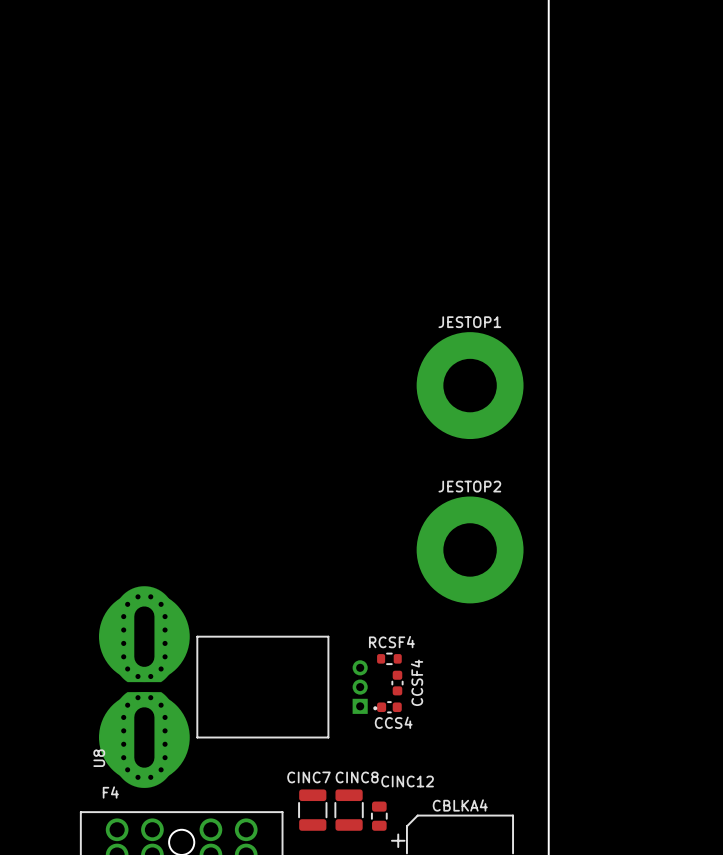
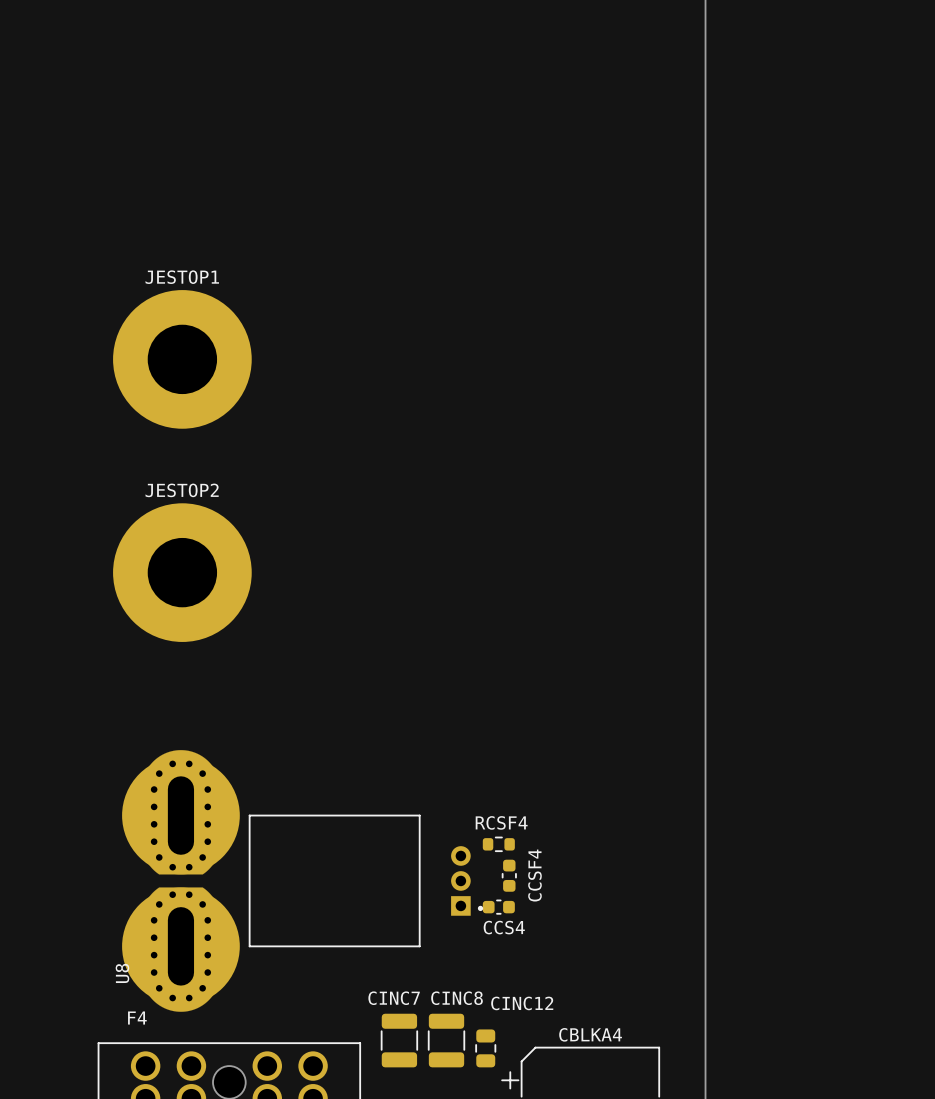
JESTOP1 position: (470, 385) -> (182, 359)
JESTOP2 position: (470, 549) -> (182, 572)

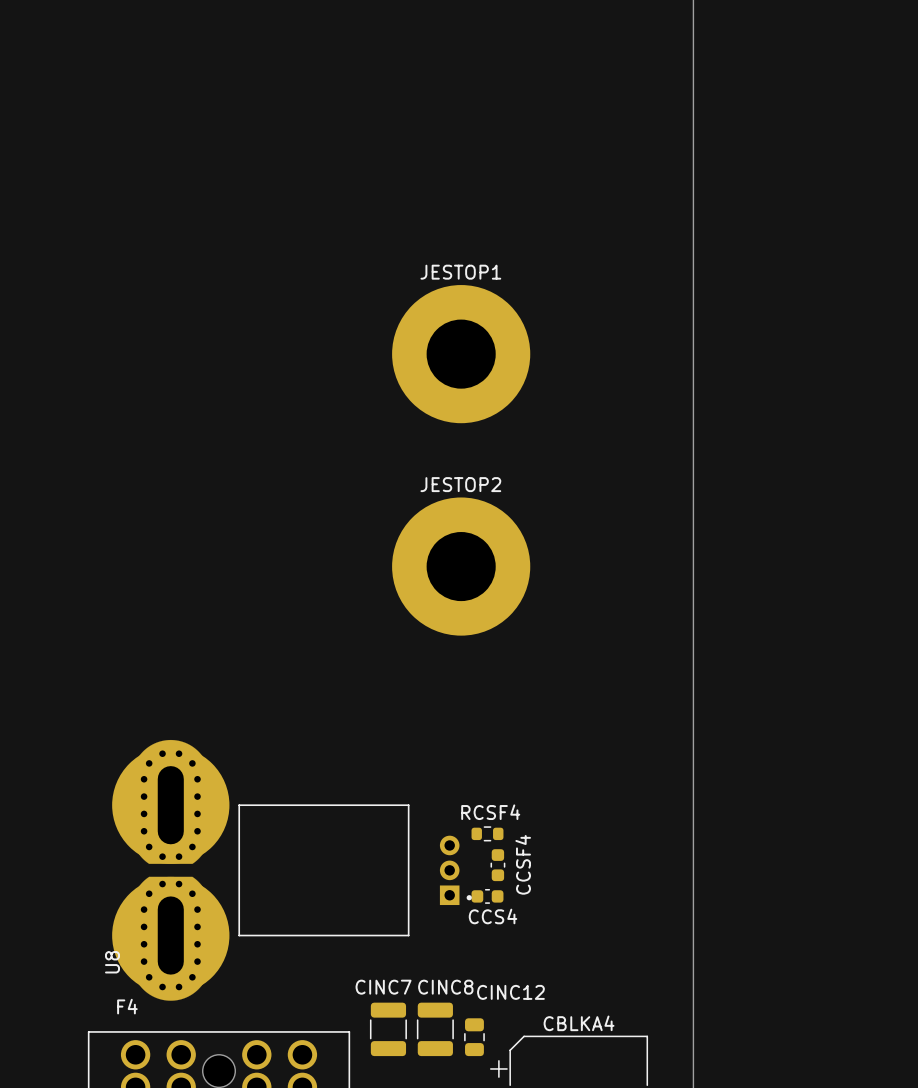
JESTOP1 position: (182, 359) -> (461, 354)
JESTOP2 position: (182, 572) -> (461, 566)

